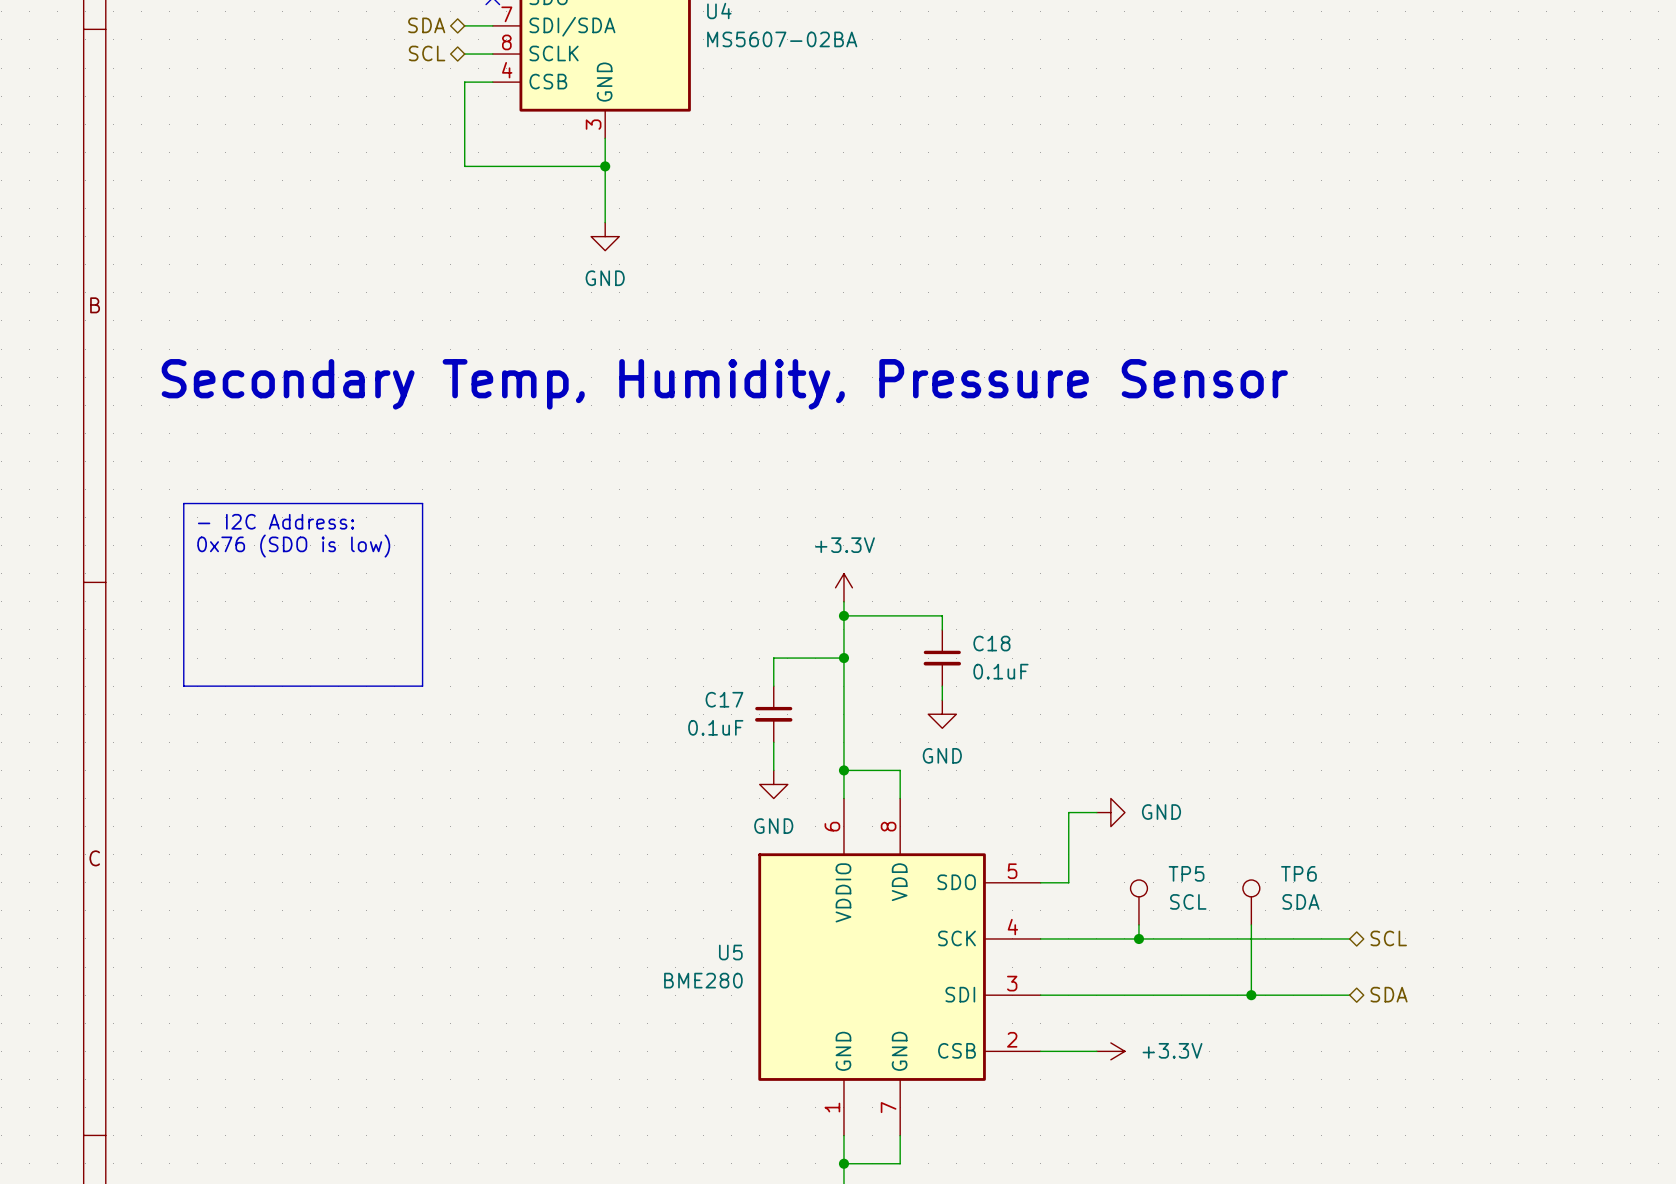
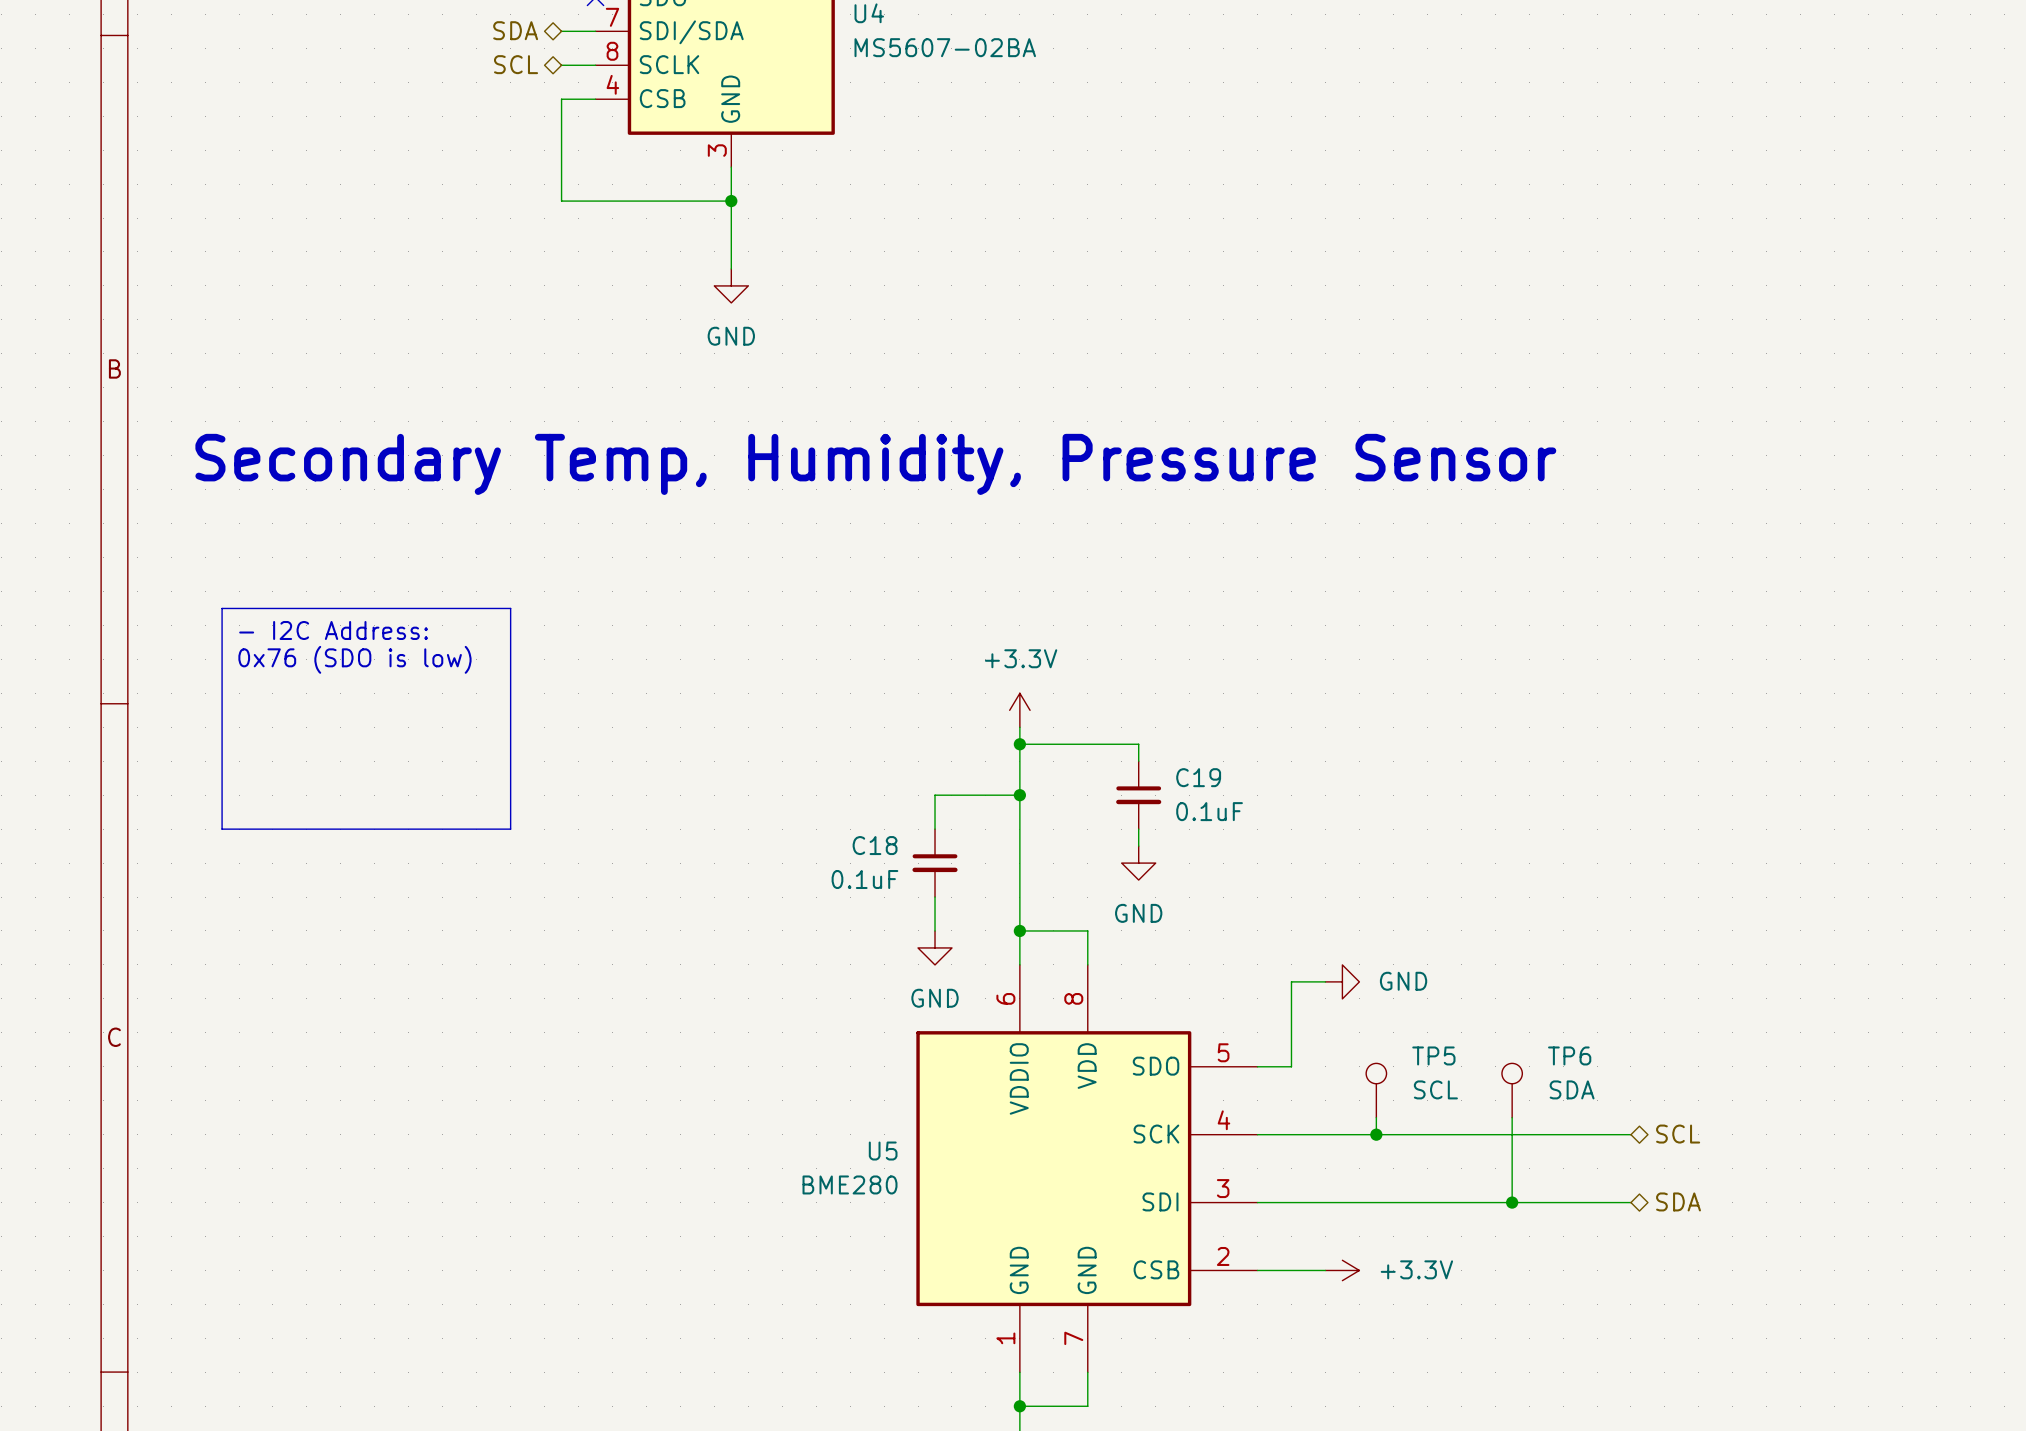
C18 name: C18 (991, 643) -> C19 (1198, 777)
C17 name: C17 (724, 699) -> C18 (875, 845)

